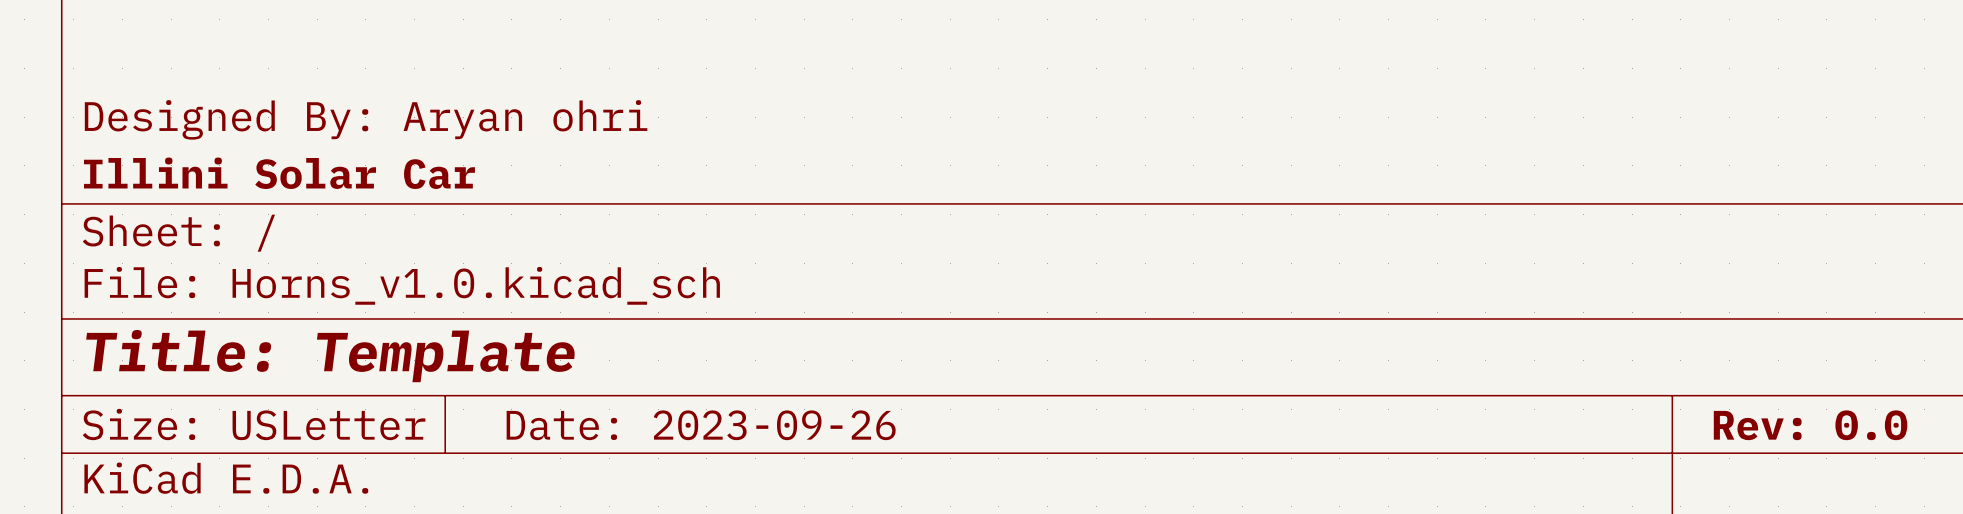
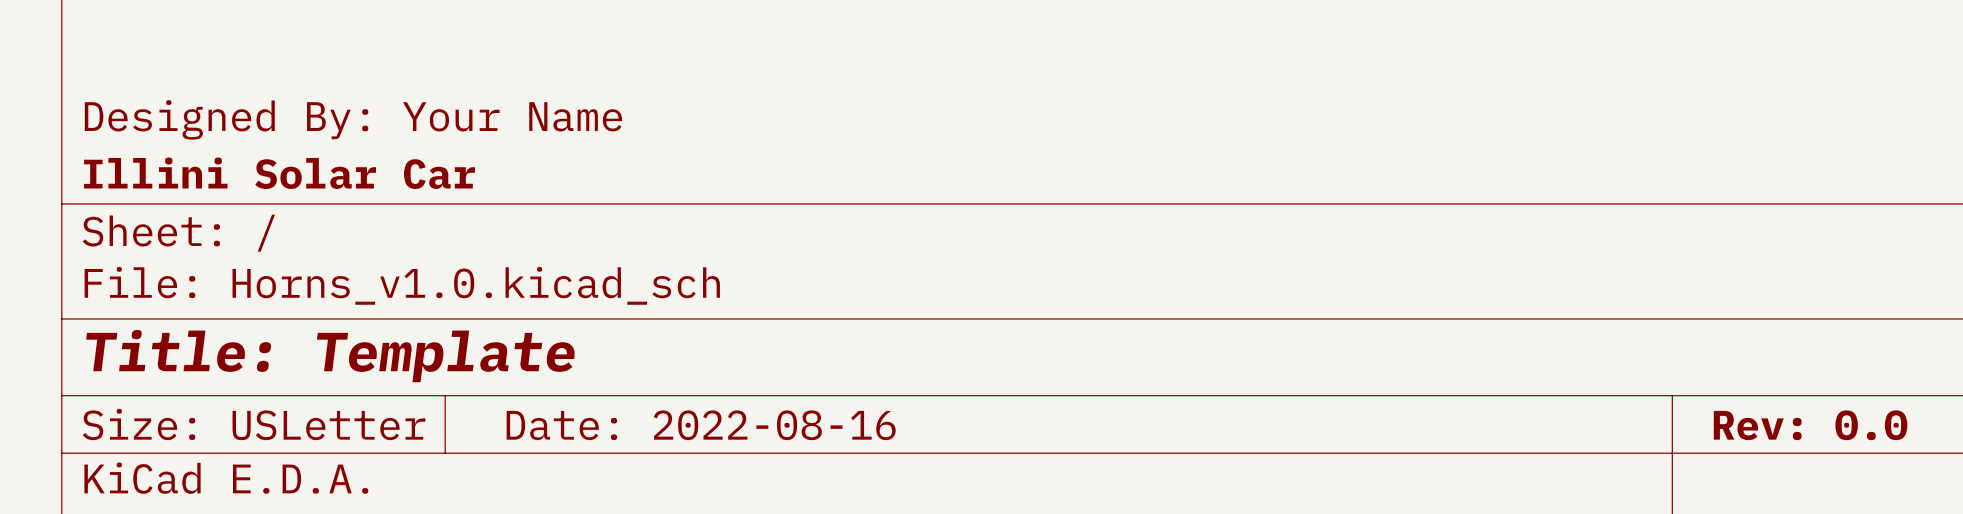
title block: Designed By: Aryan ohri (366, 119) -> Designed By: Your Name (353, 119)
title block: Date: 2023-09-26 (701, 425) -> Date: 2022-08-16 (701, 425)

